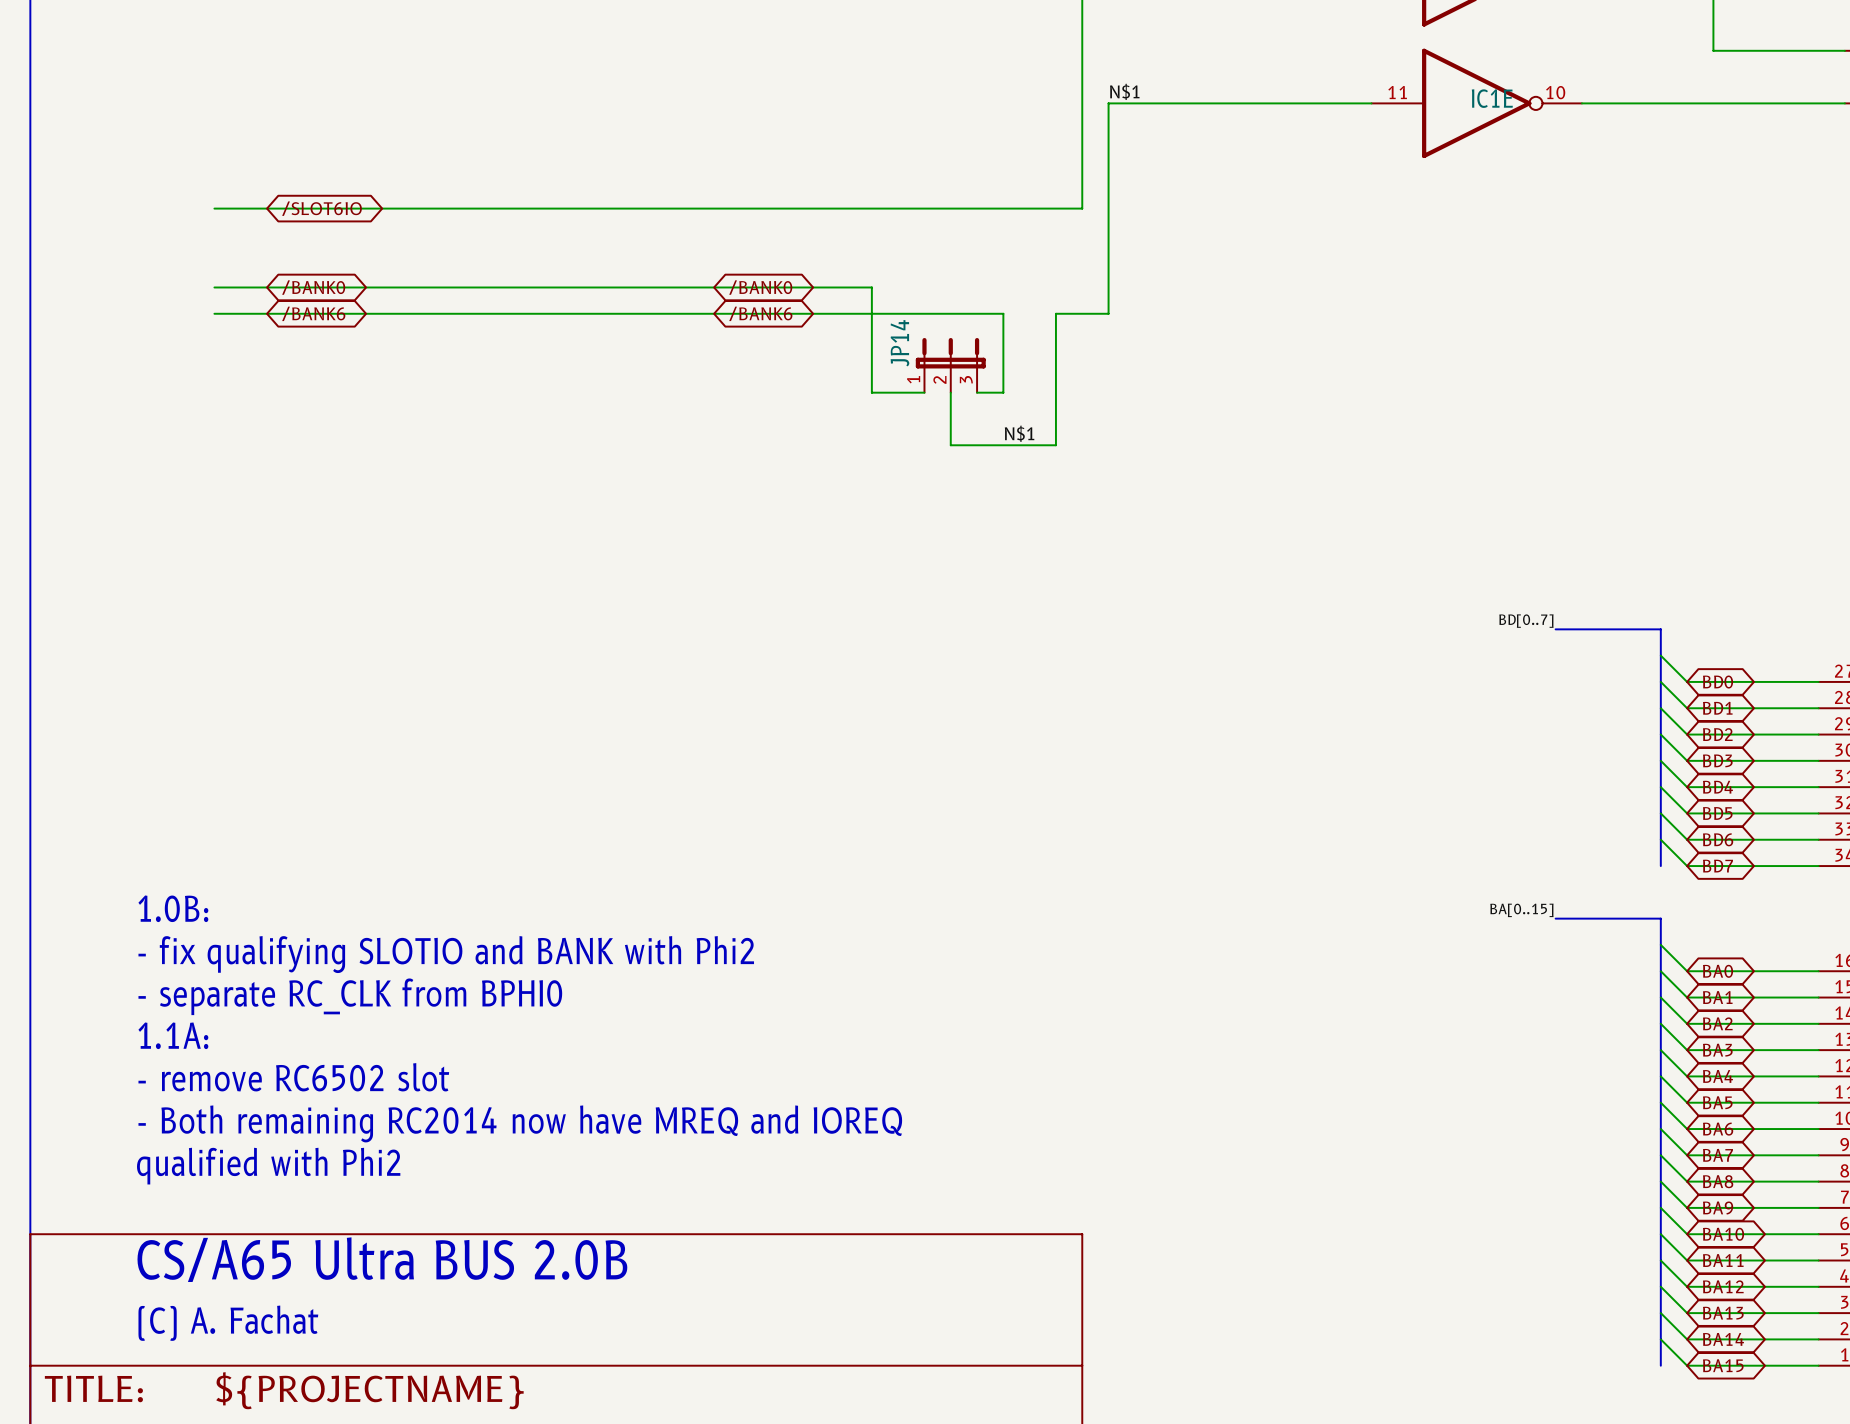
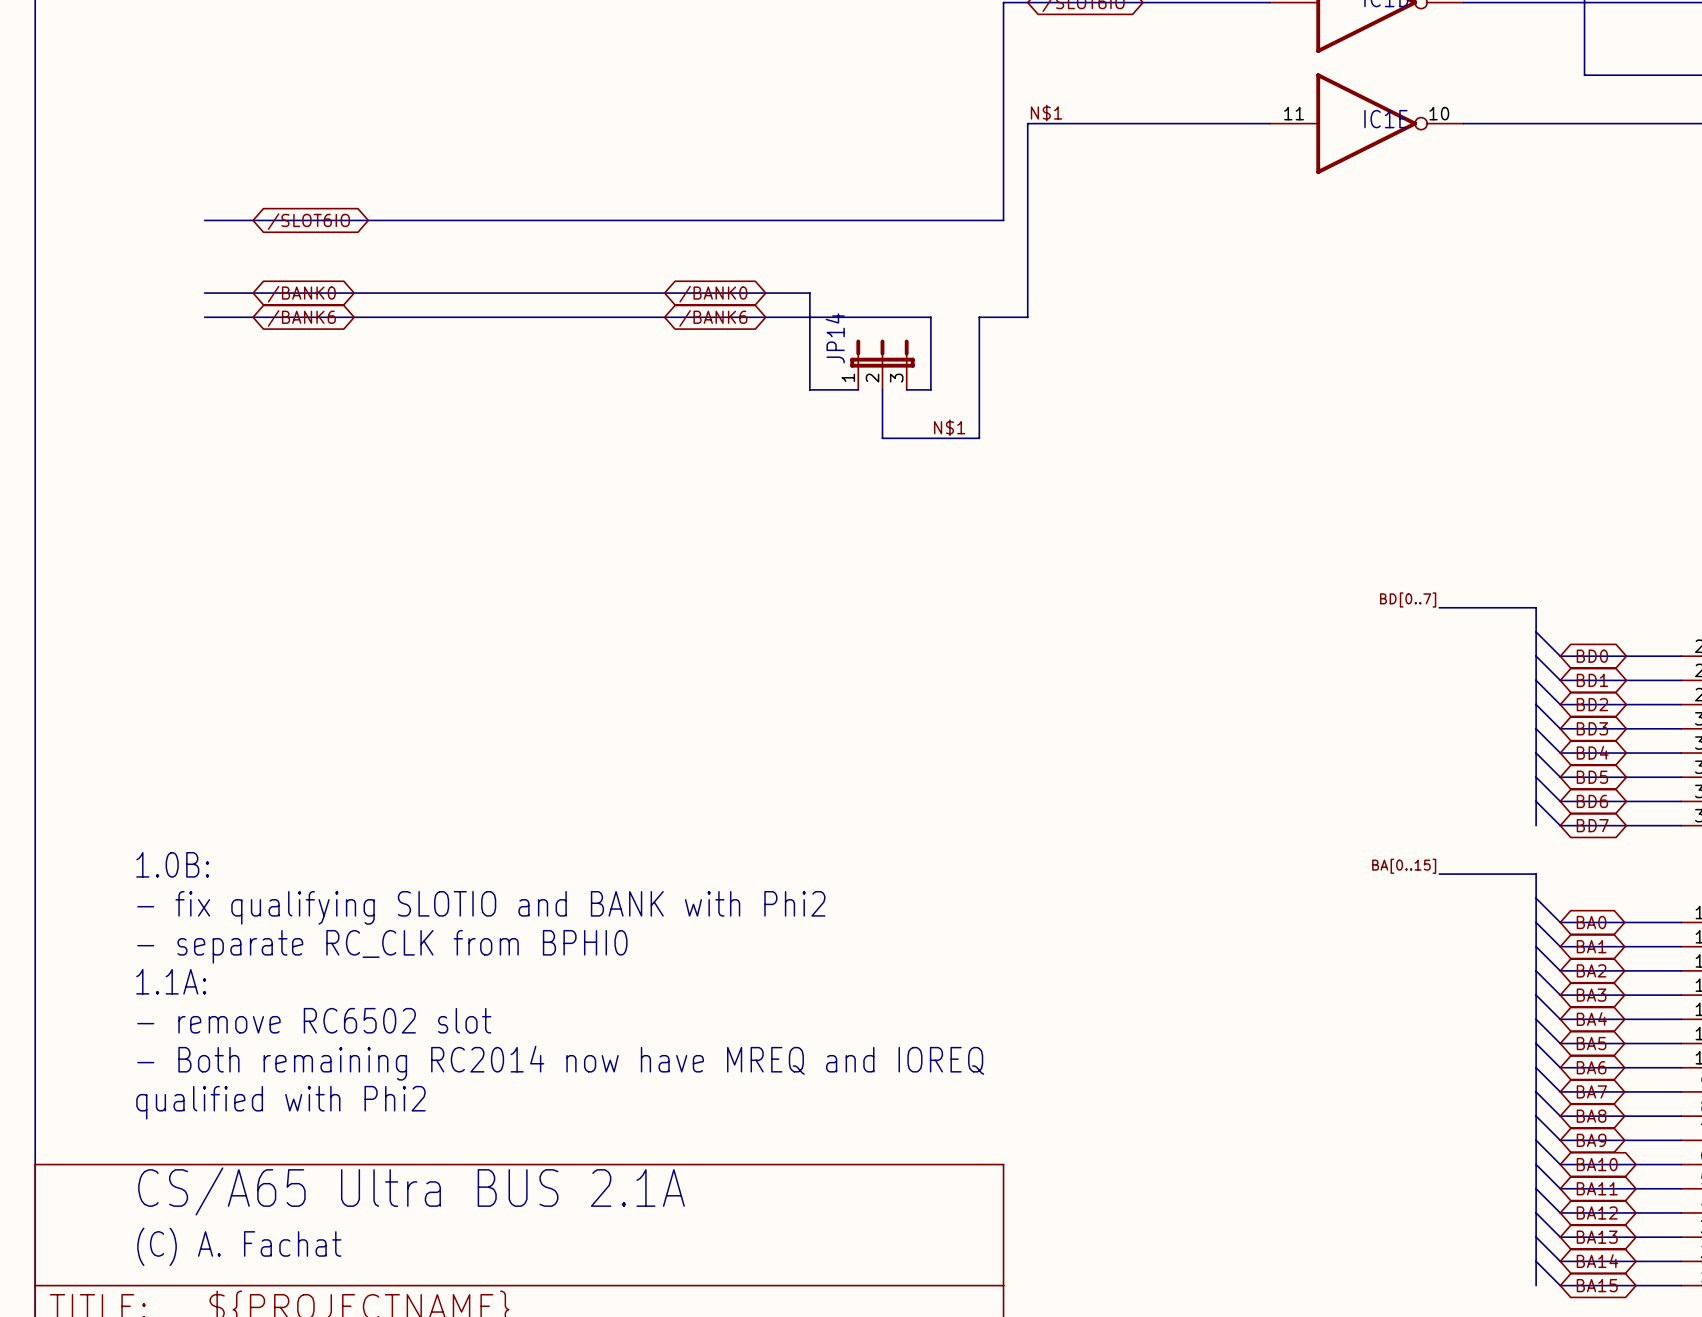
text: CS/A65 Ultra BUS 2.0B (382, 1259) -> CS/A65 Ultra BUS 2.1A (411, 1191)

